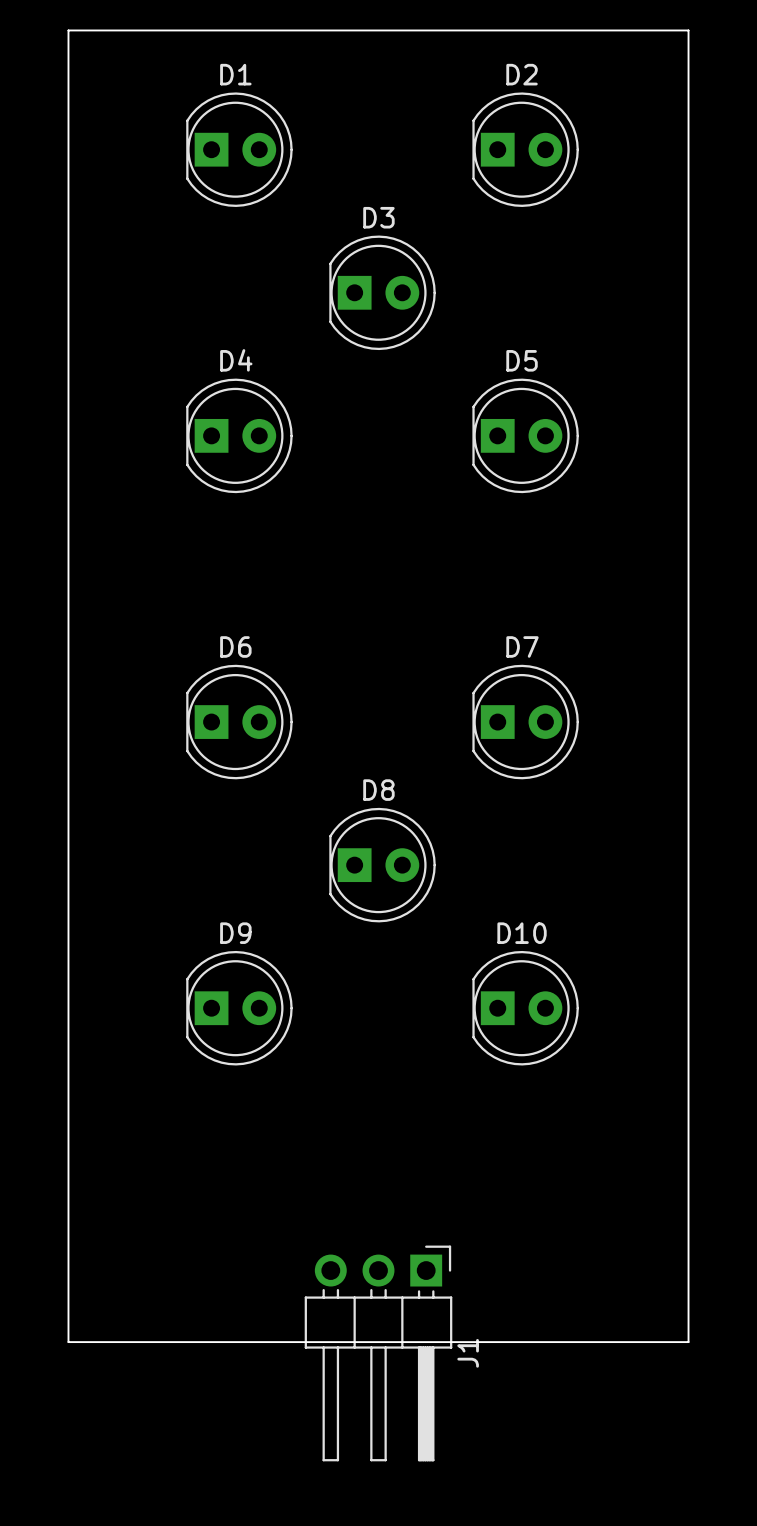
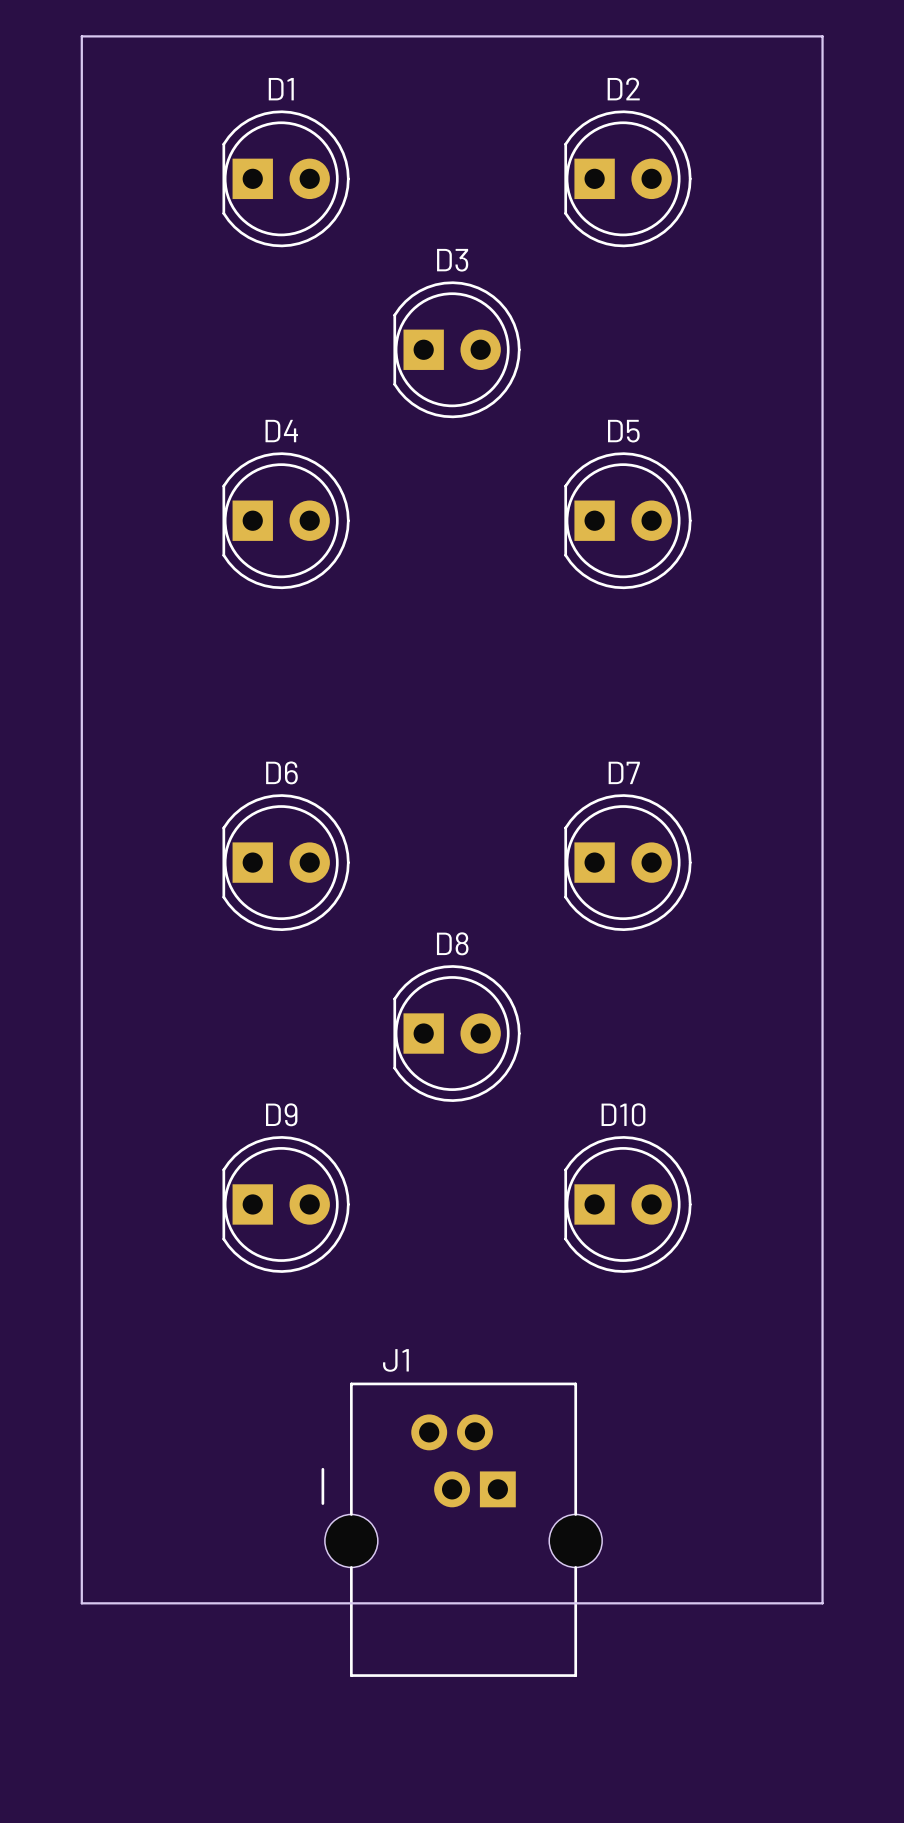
J1 footprint: [304, 1245, 453, 1462] -> [321, 1382, 603, 1677]
J1 name position: J1 (468, 1353) -> J1 (395, 1360)

